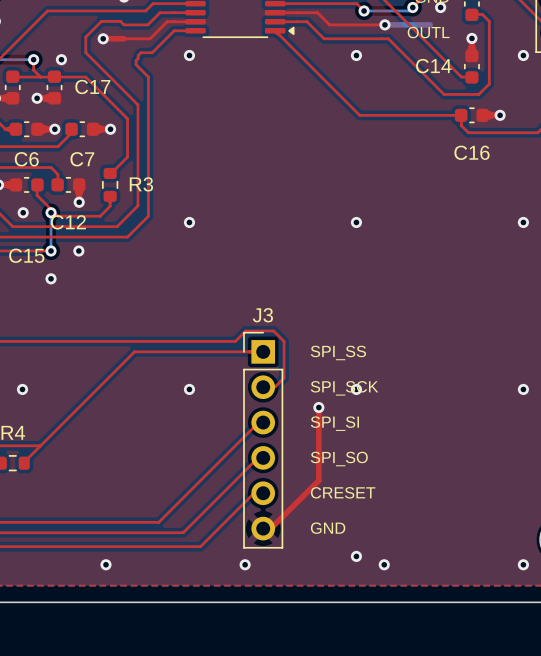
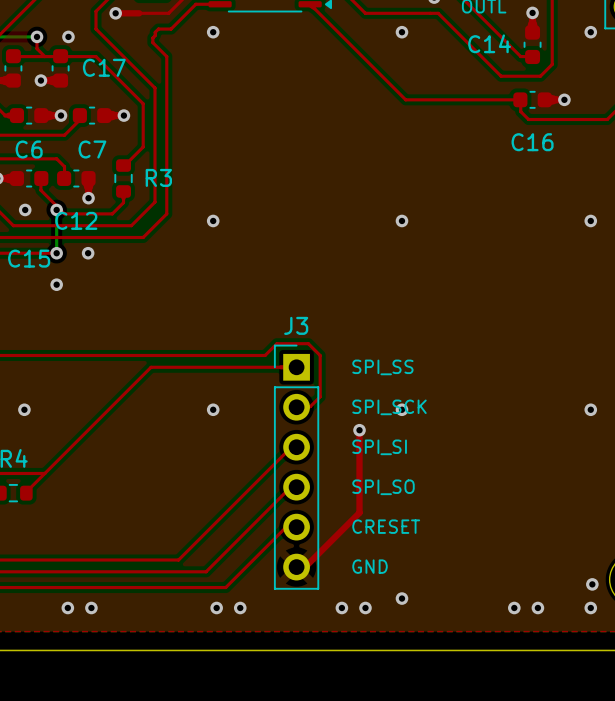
via: none -> (592, 584)
via: none -> (67, 607)
via: none -> (91, 607)
via: (105, 564) -> none
via: none -> (216, 607)
via: none -> (240, 607)
via: (245, 564) -> none
via: none -> (341, 607)
via: none -> (365, 607)
via: (384, 564) -> none
via: none -> (514, 607)
via: none -> (537, 607)

